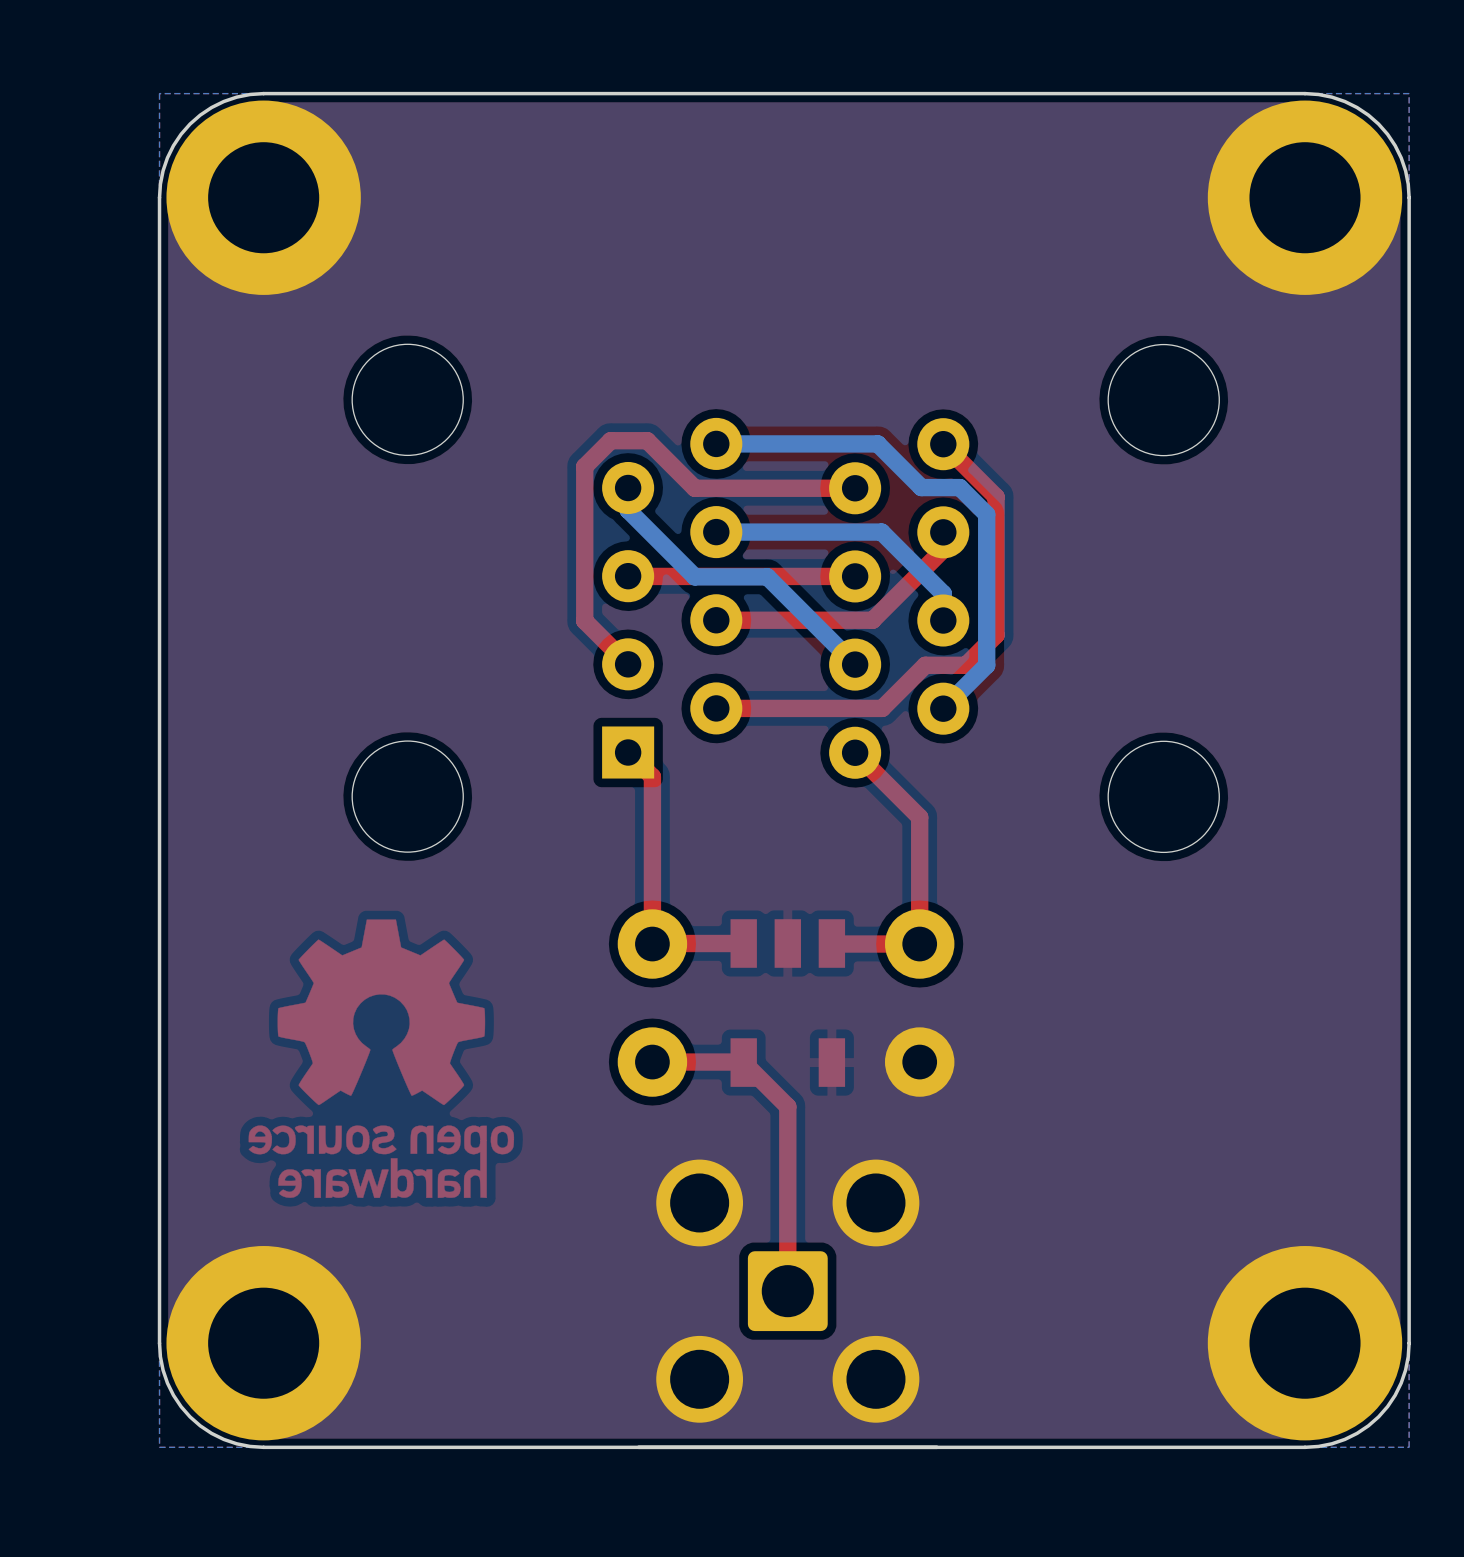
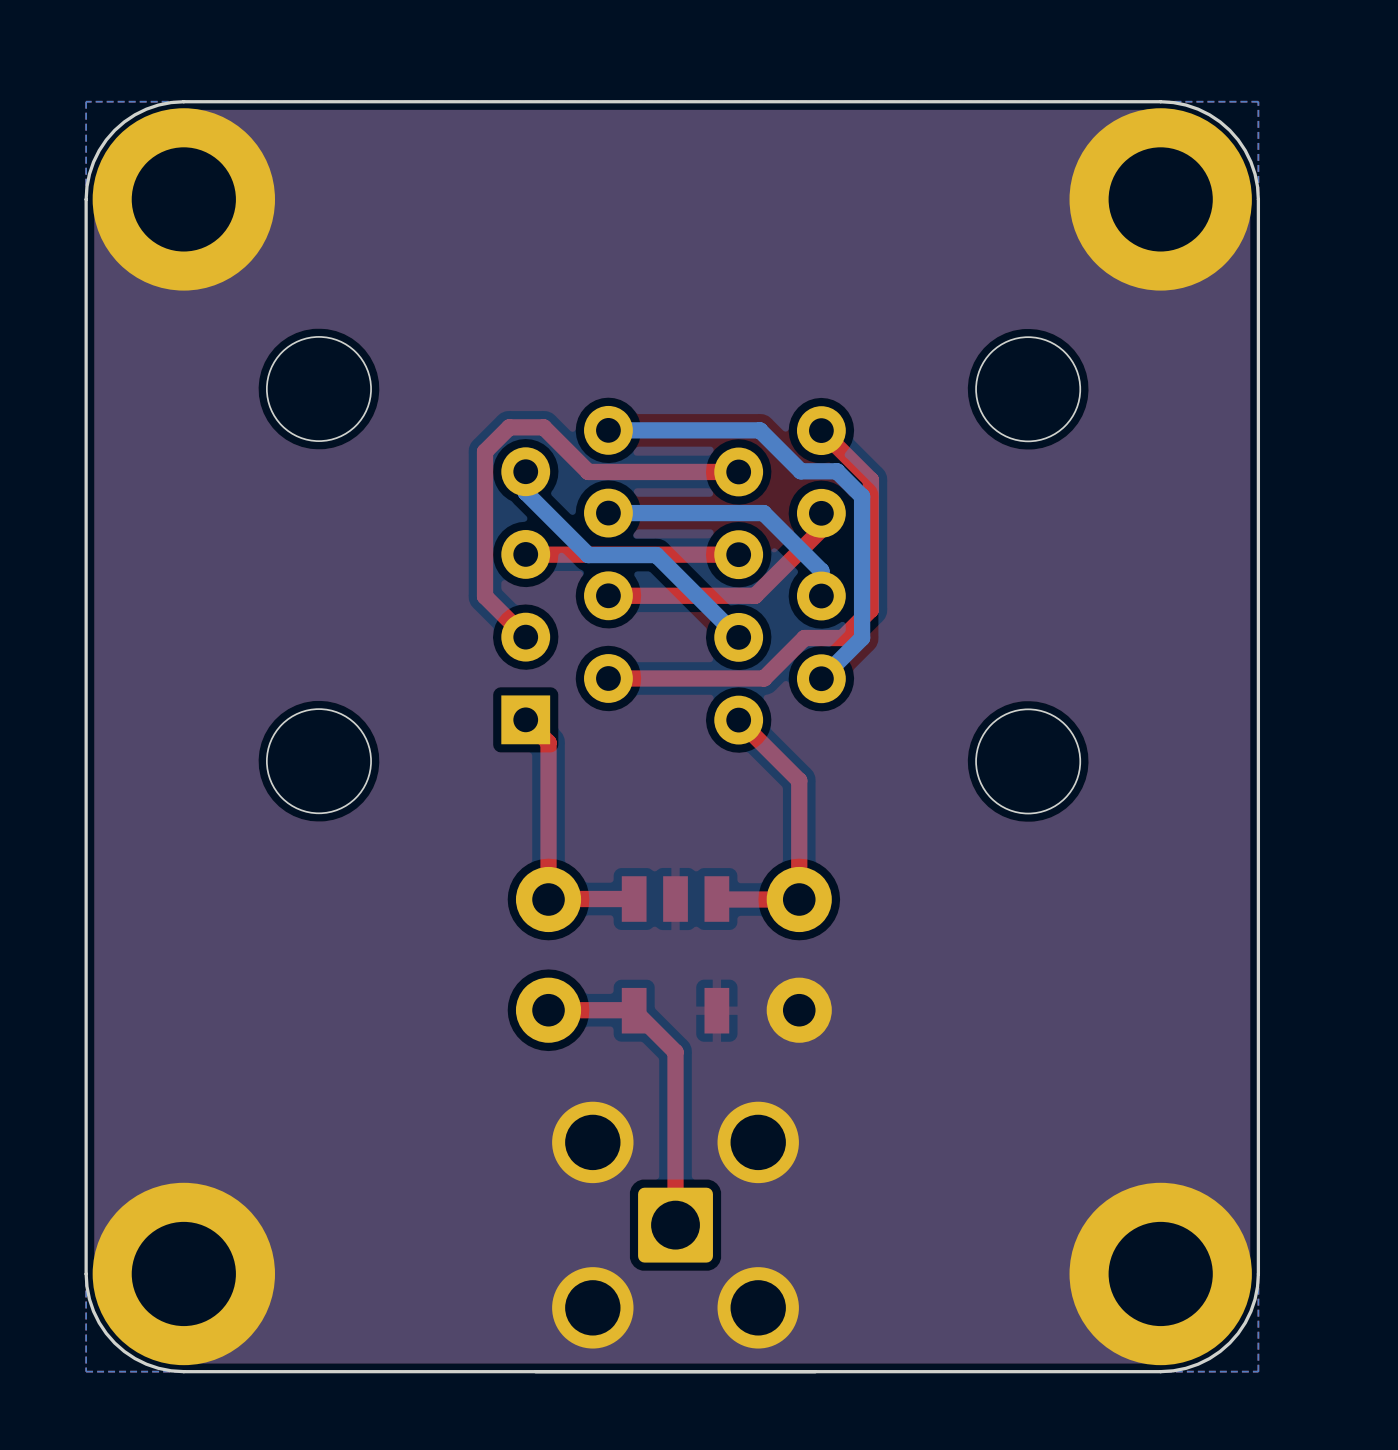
drawing: [248, 919, 515, 1199] -> none

